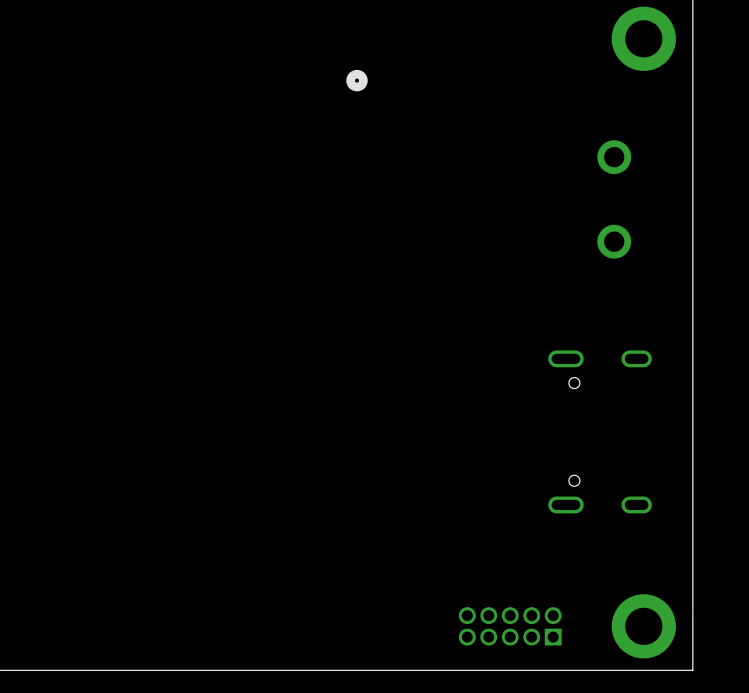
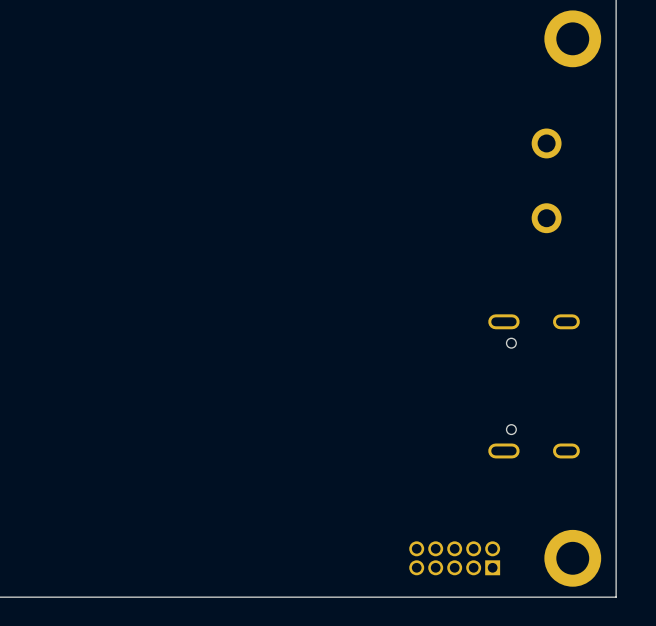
part: (357, 80) -> none

